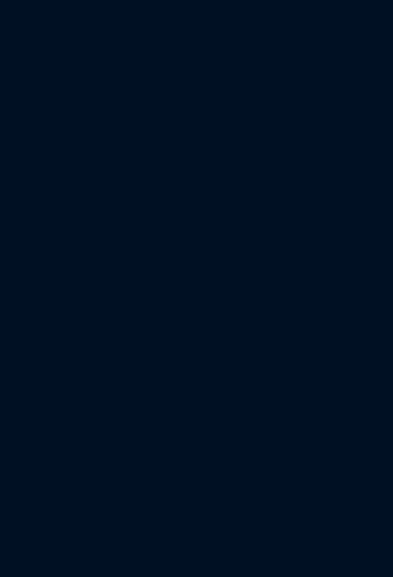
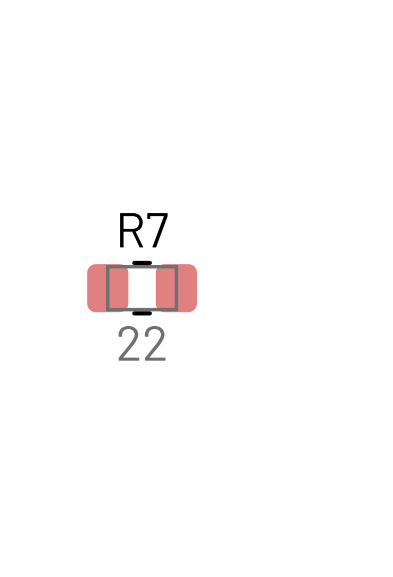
R7: none -> 22 (142, 288)

